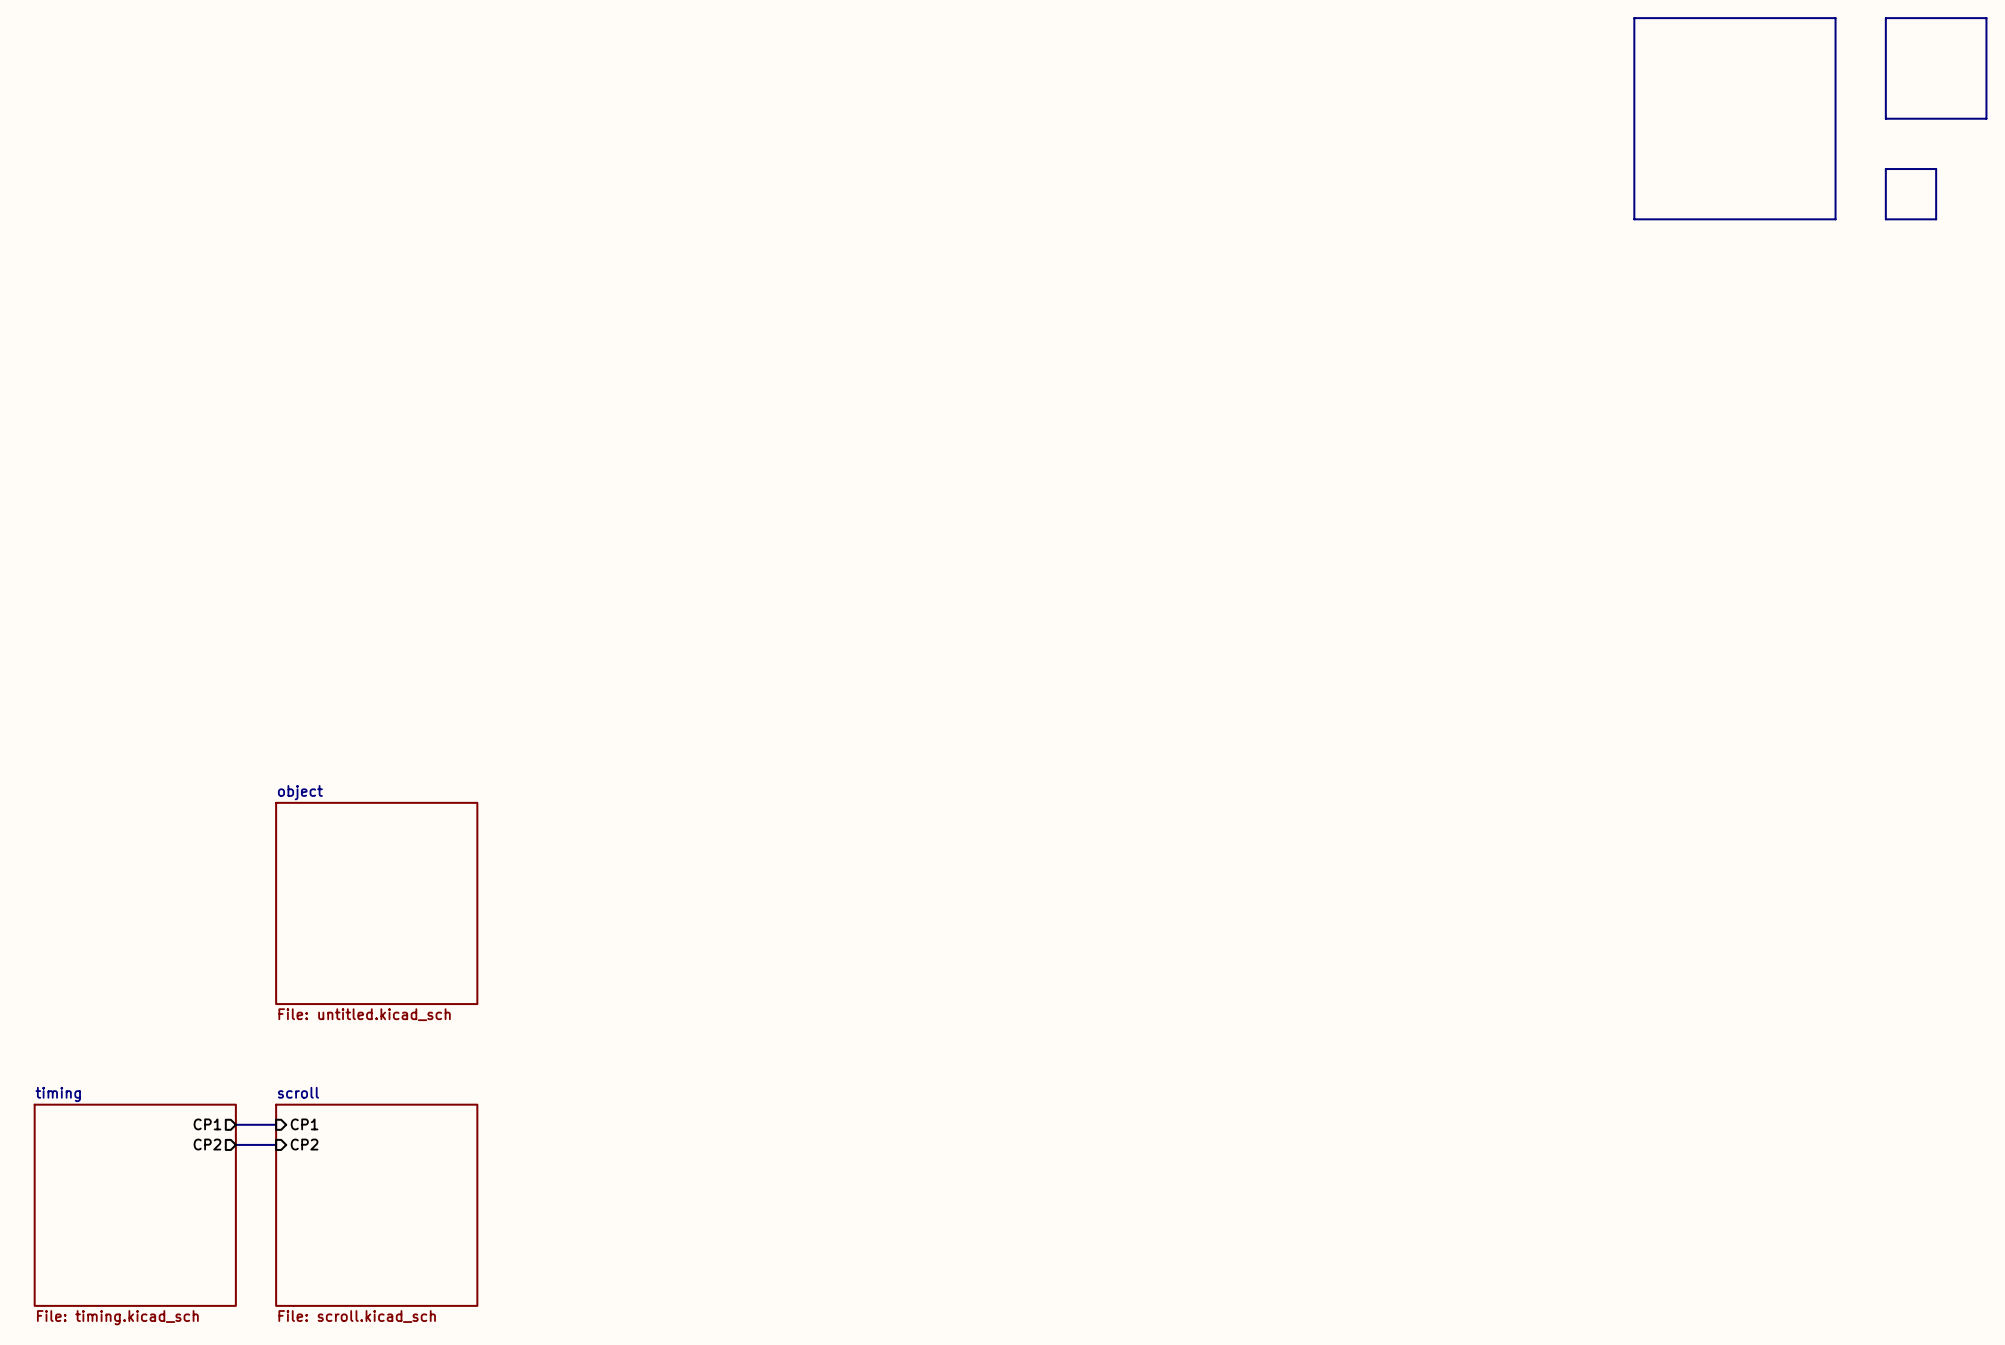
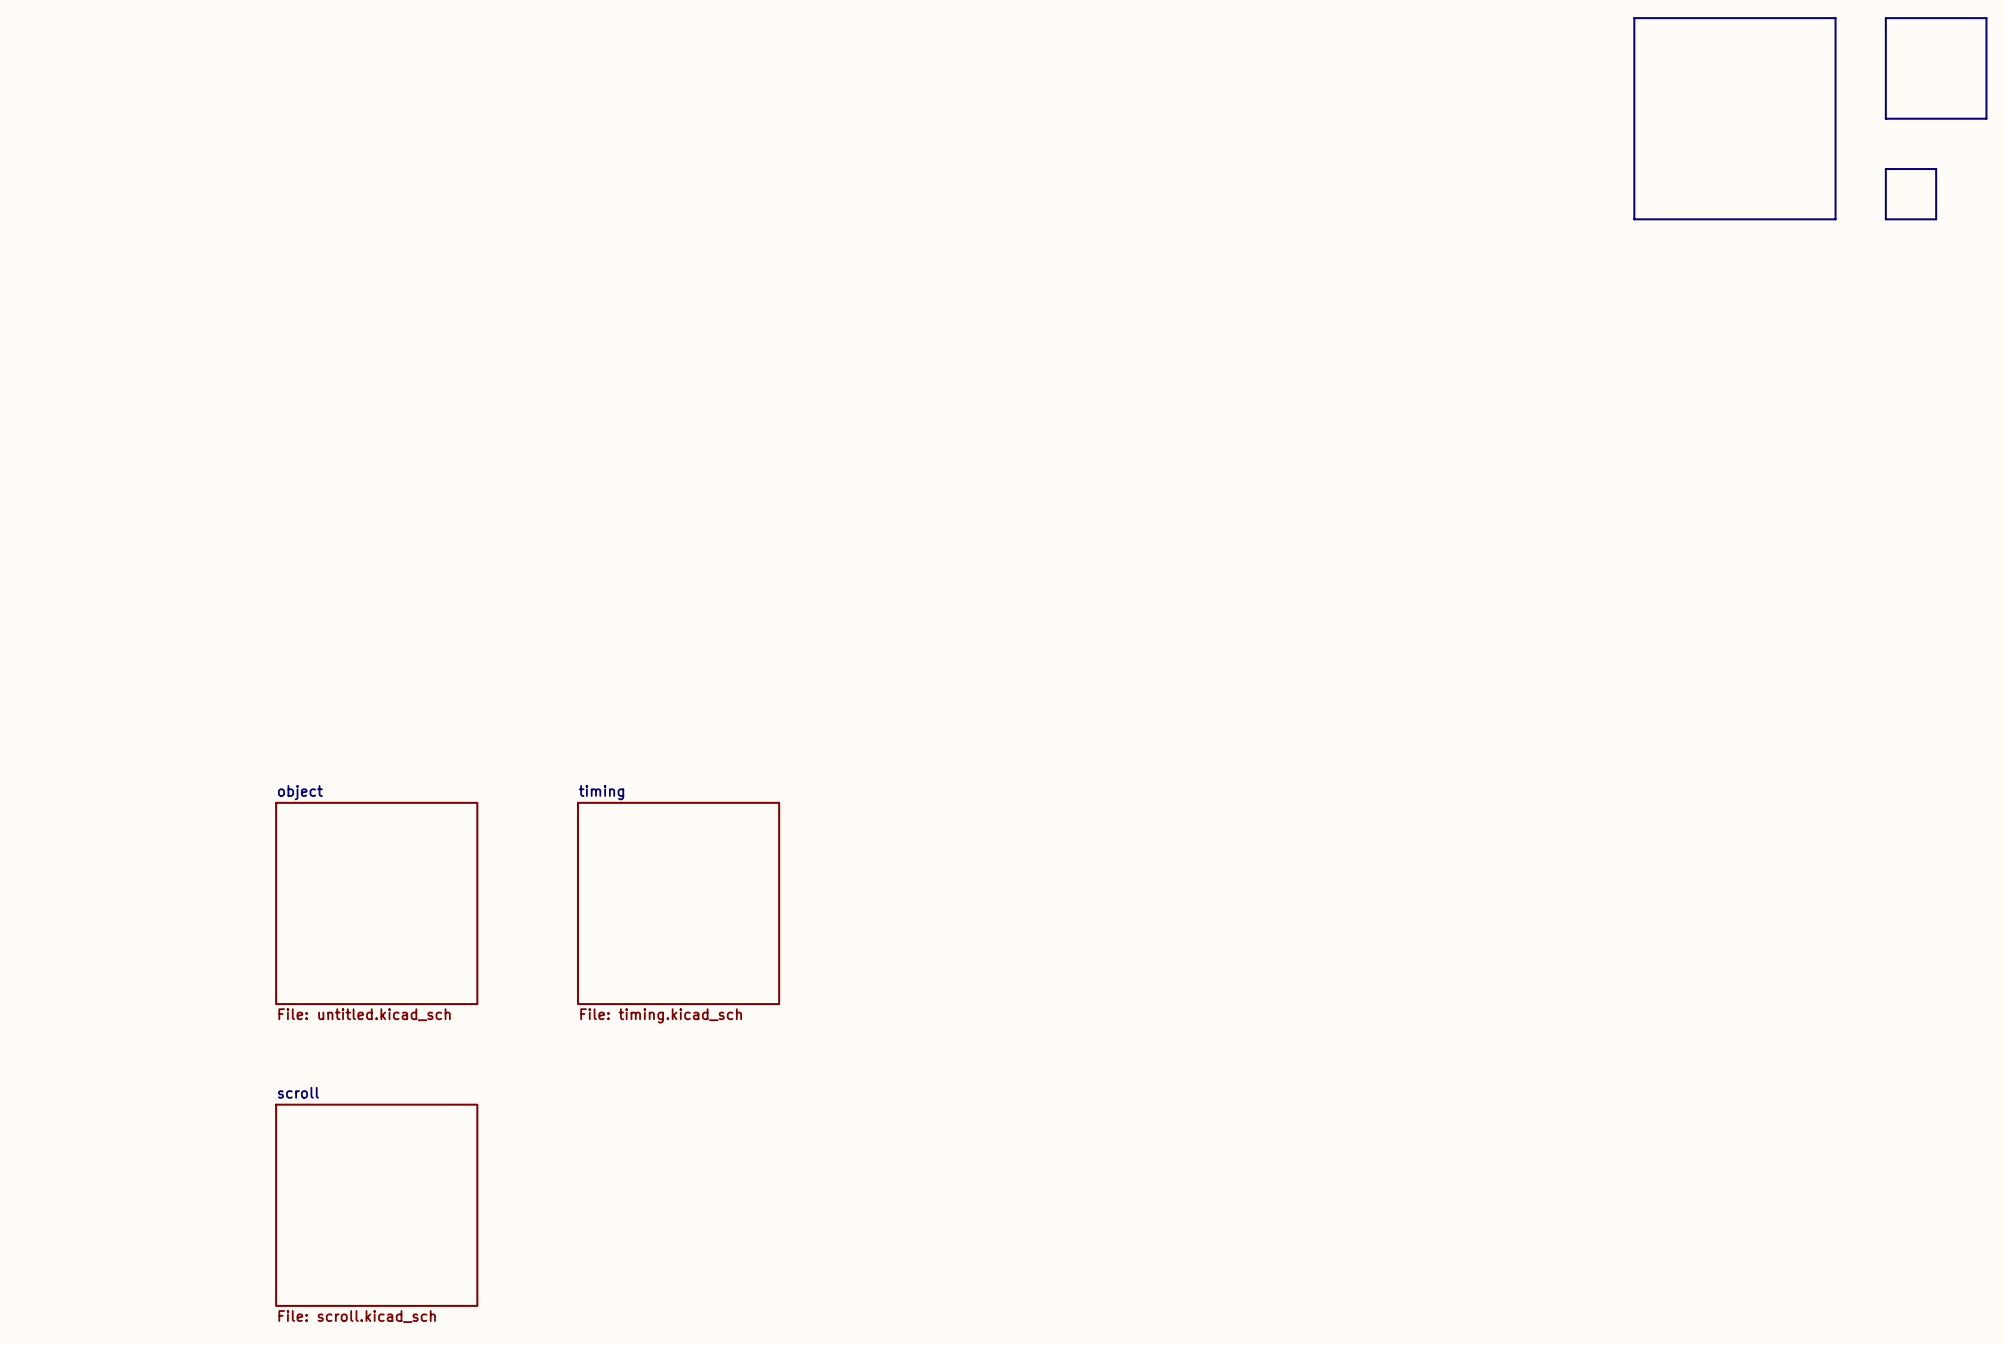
sheet timing: none -> File: timing.kicad_sch (678, 903)
sheet pin: CP1 (207, 1124) -> none
wire: (235, 1124) (276, 1124) -> none
sheet pin: CP1 (304, 1124) -> none
sheet pin: CP2 (207, 1144) -> none
wire: (235, 1144) (276, 1144) -> none
sheet pin: CP2 (304, 1144) -> none
sheet timing: File: timing.kicad_sch (135, 1205) -> none

